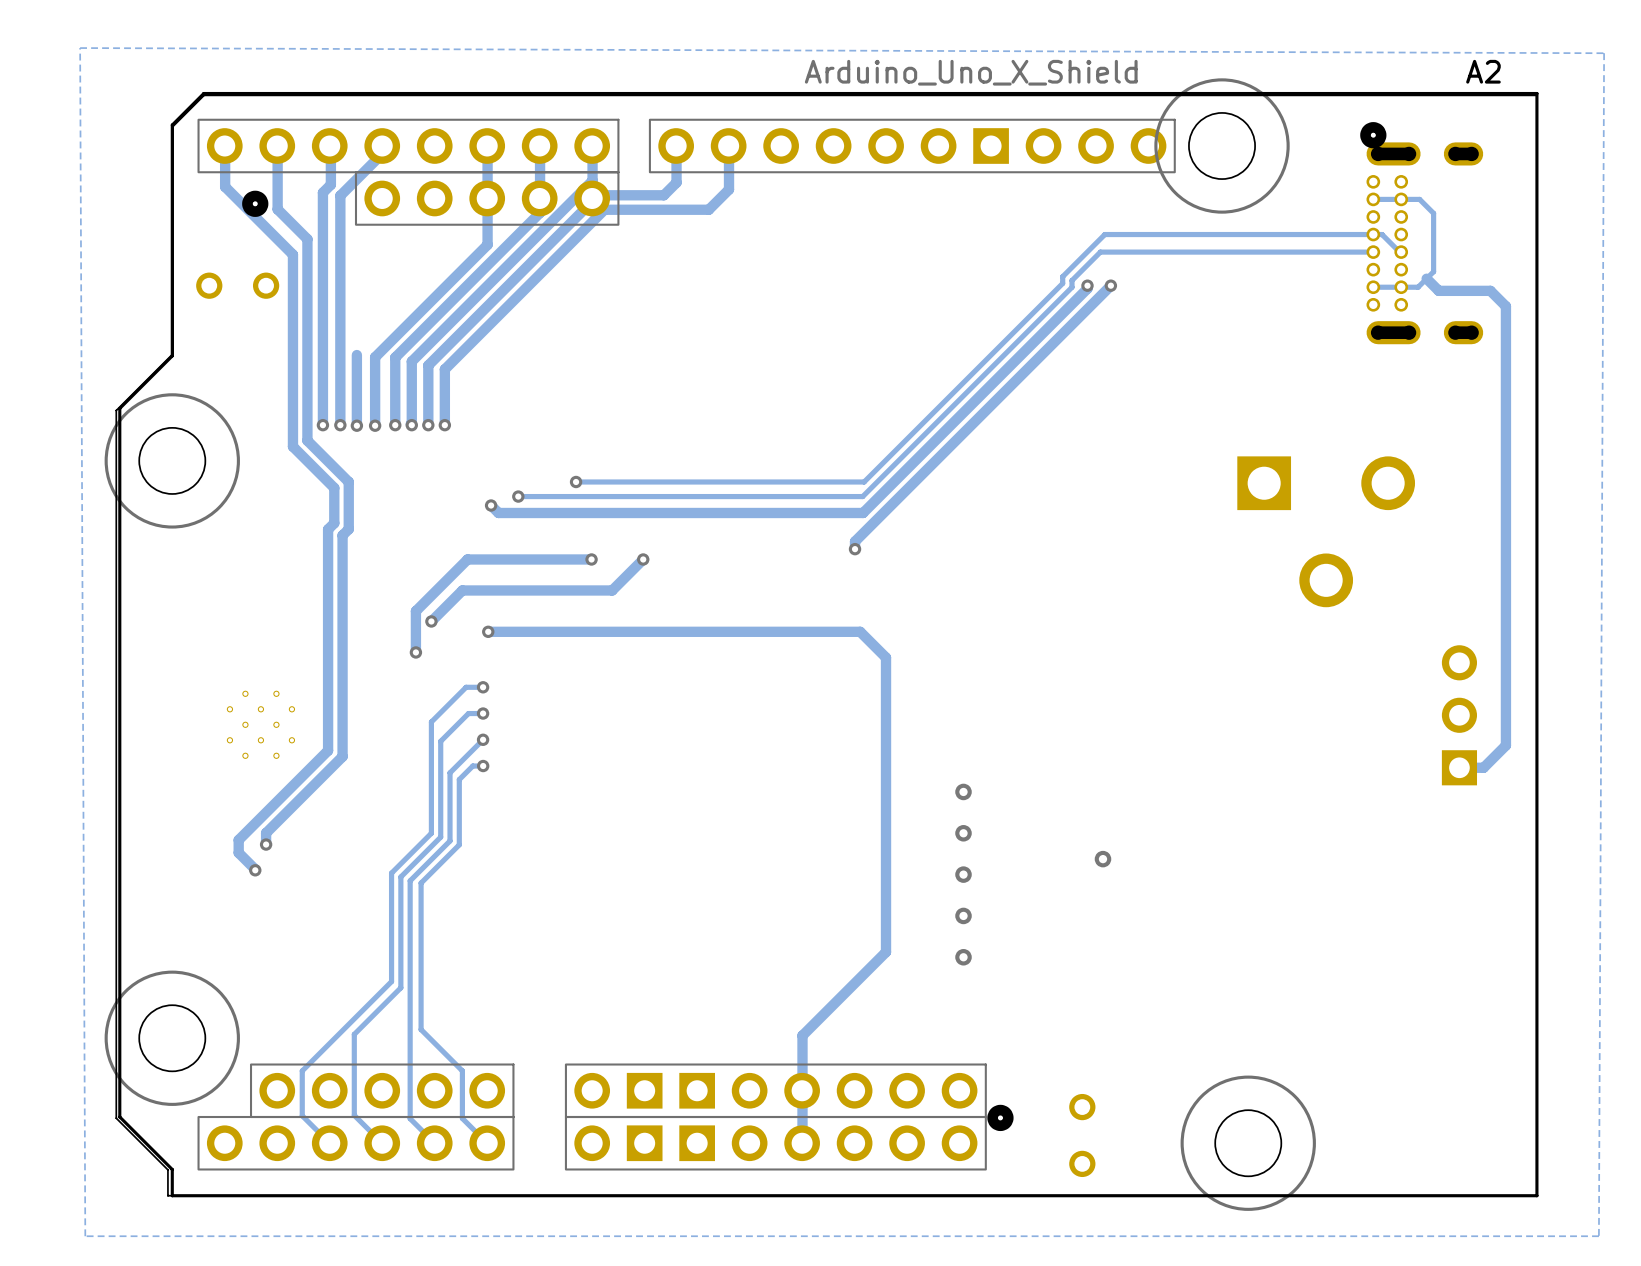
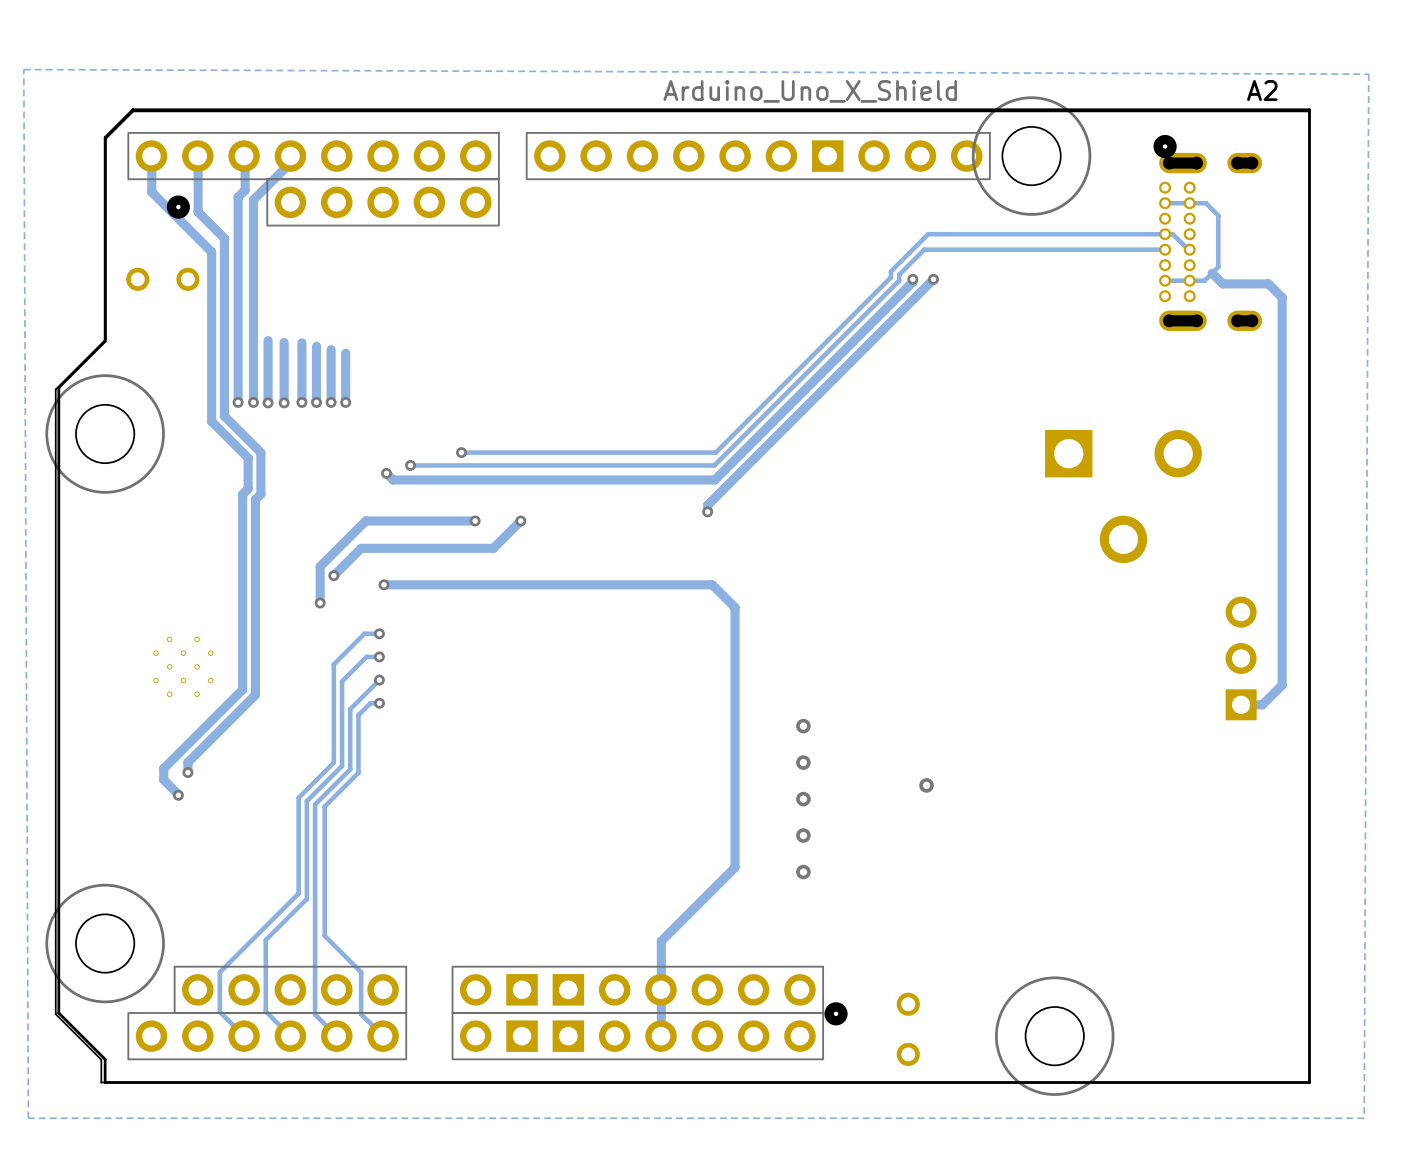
track: (487, 148) (487, 244) (375, 357) -> none
track: (540, 148) (540, 212) (395, 357) -> none
track: (592, 148) (592, 180) (411, 361) -> none
track: (676, 148) (676, 182) (663, 195) (598, 195) (428, 365) -> none
track: (729, 148) (729, 189) (708, 209) (604, 209) (444, 369) -> none

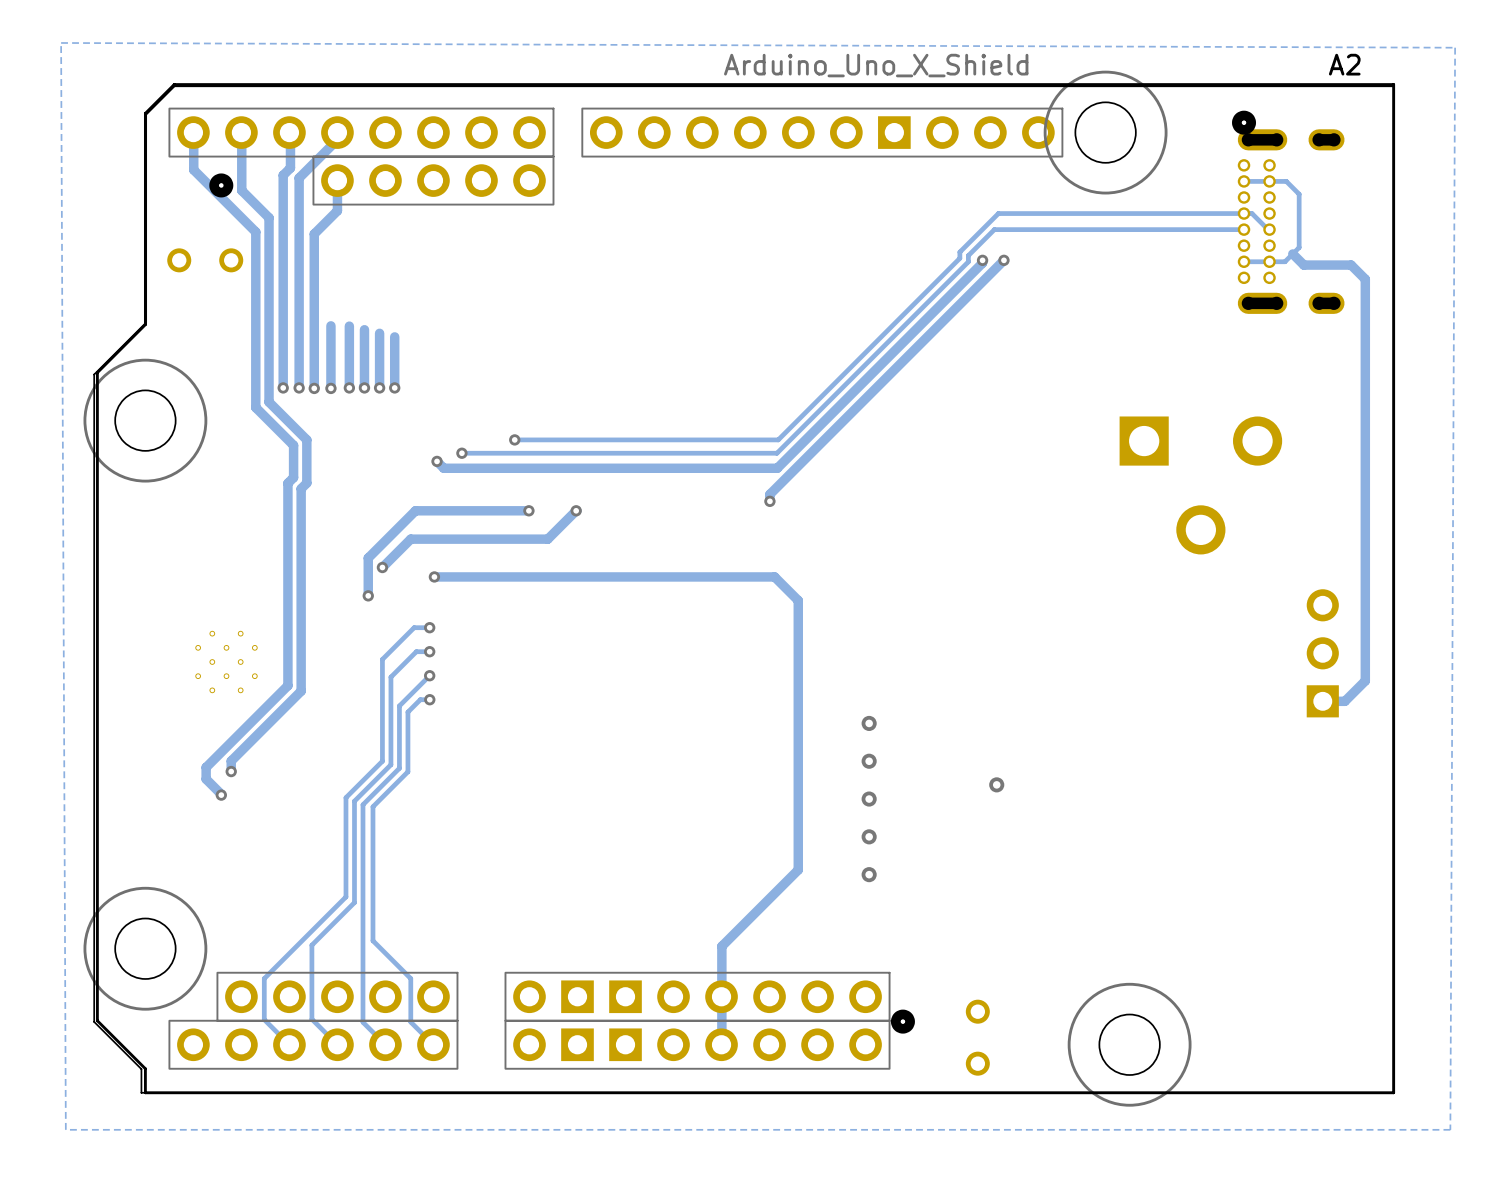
track: none -> (337, 180) (337, 210) (314, 234) (314, 323)

